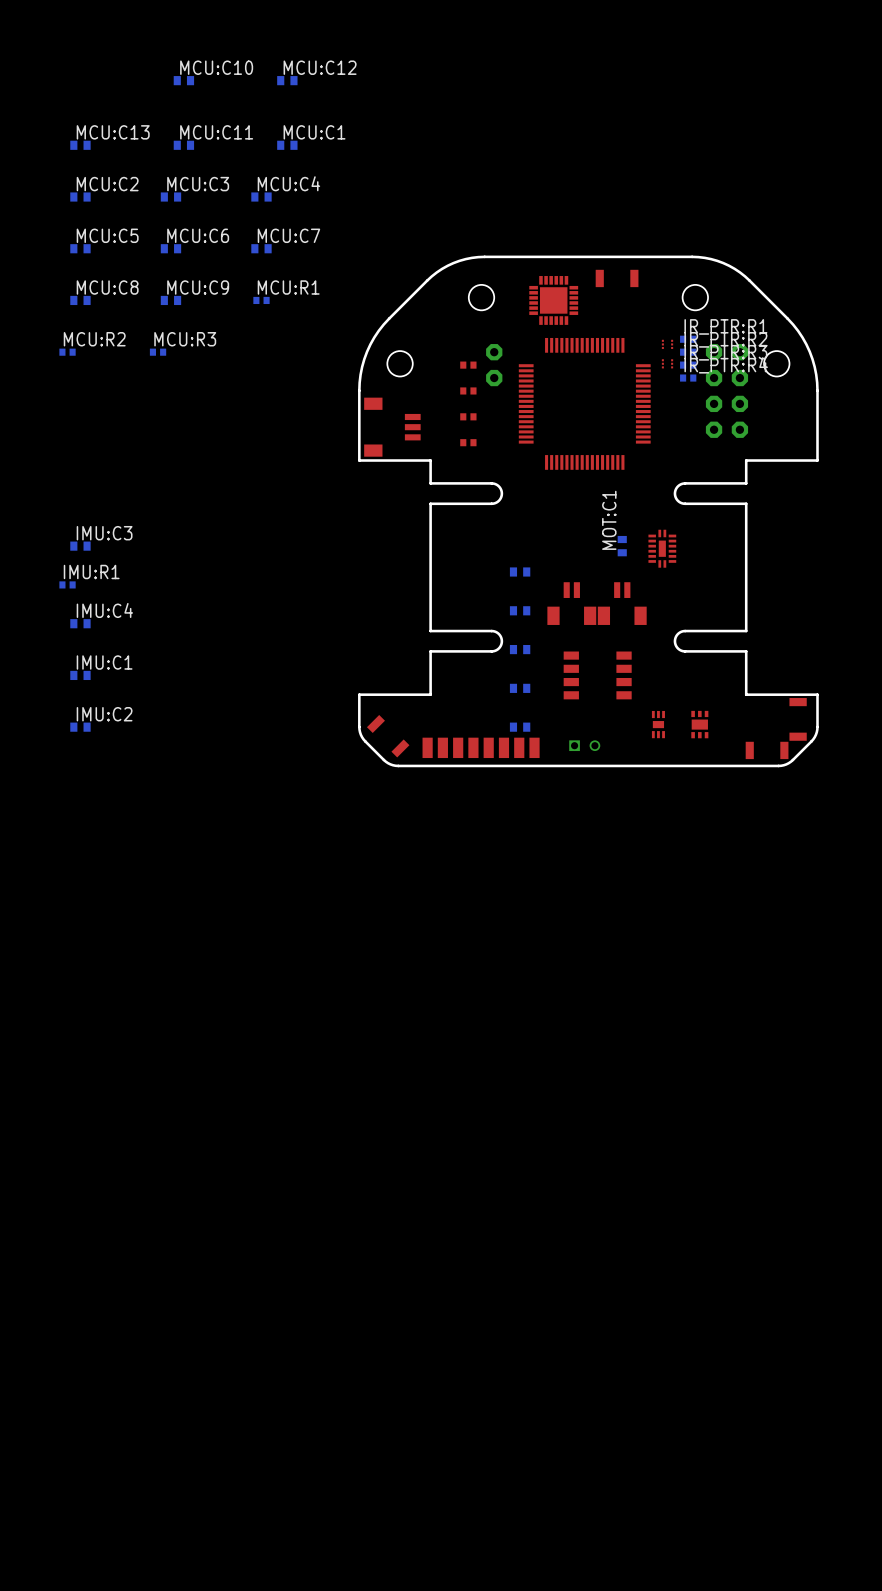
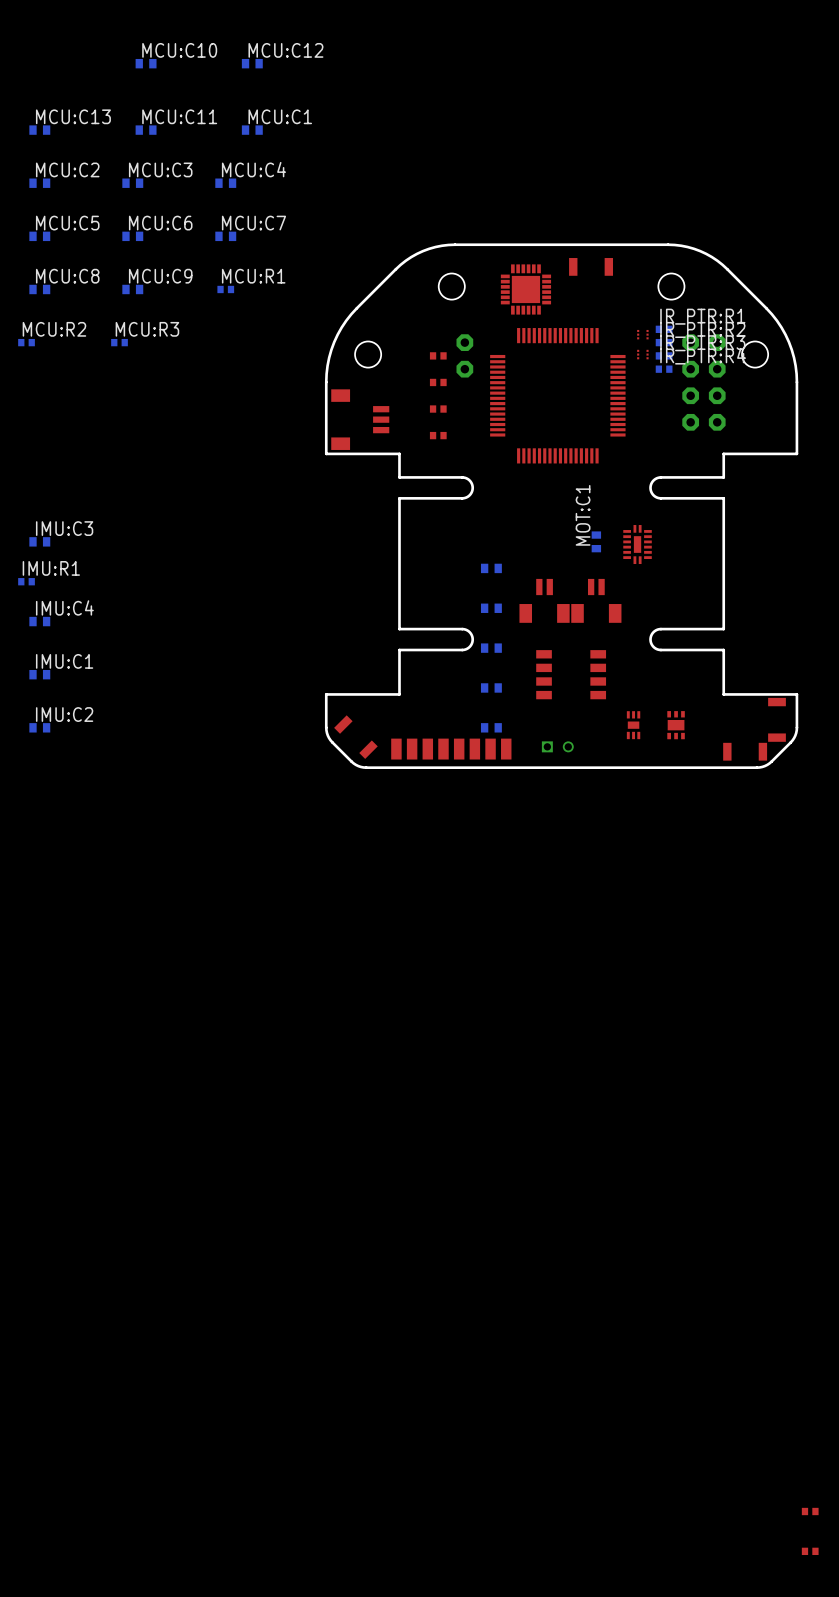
part: none -> (810, 1511)
part: none -> (810, 1551)

